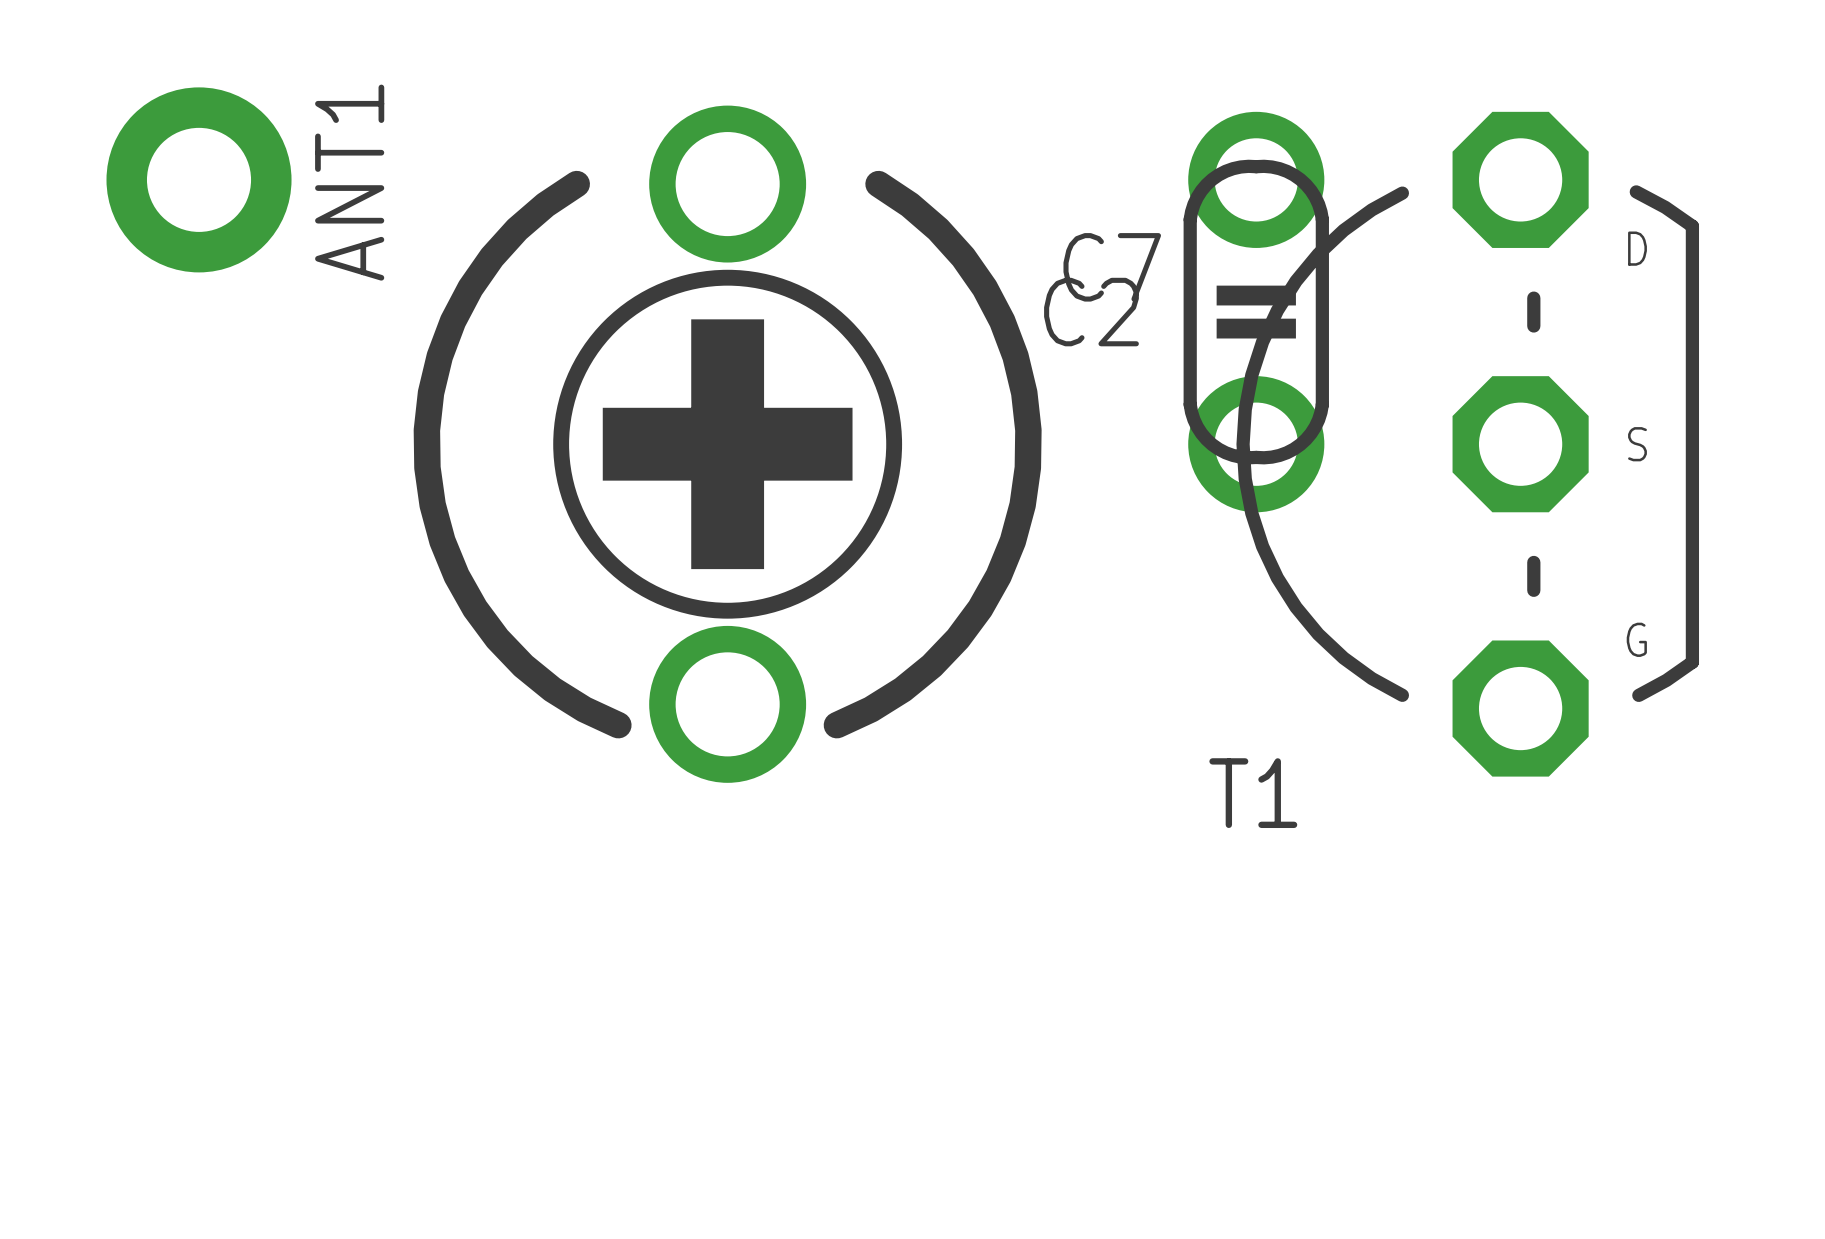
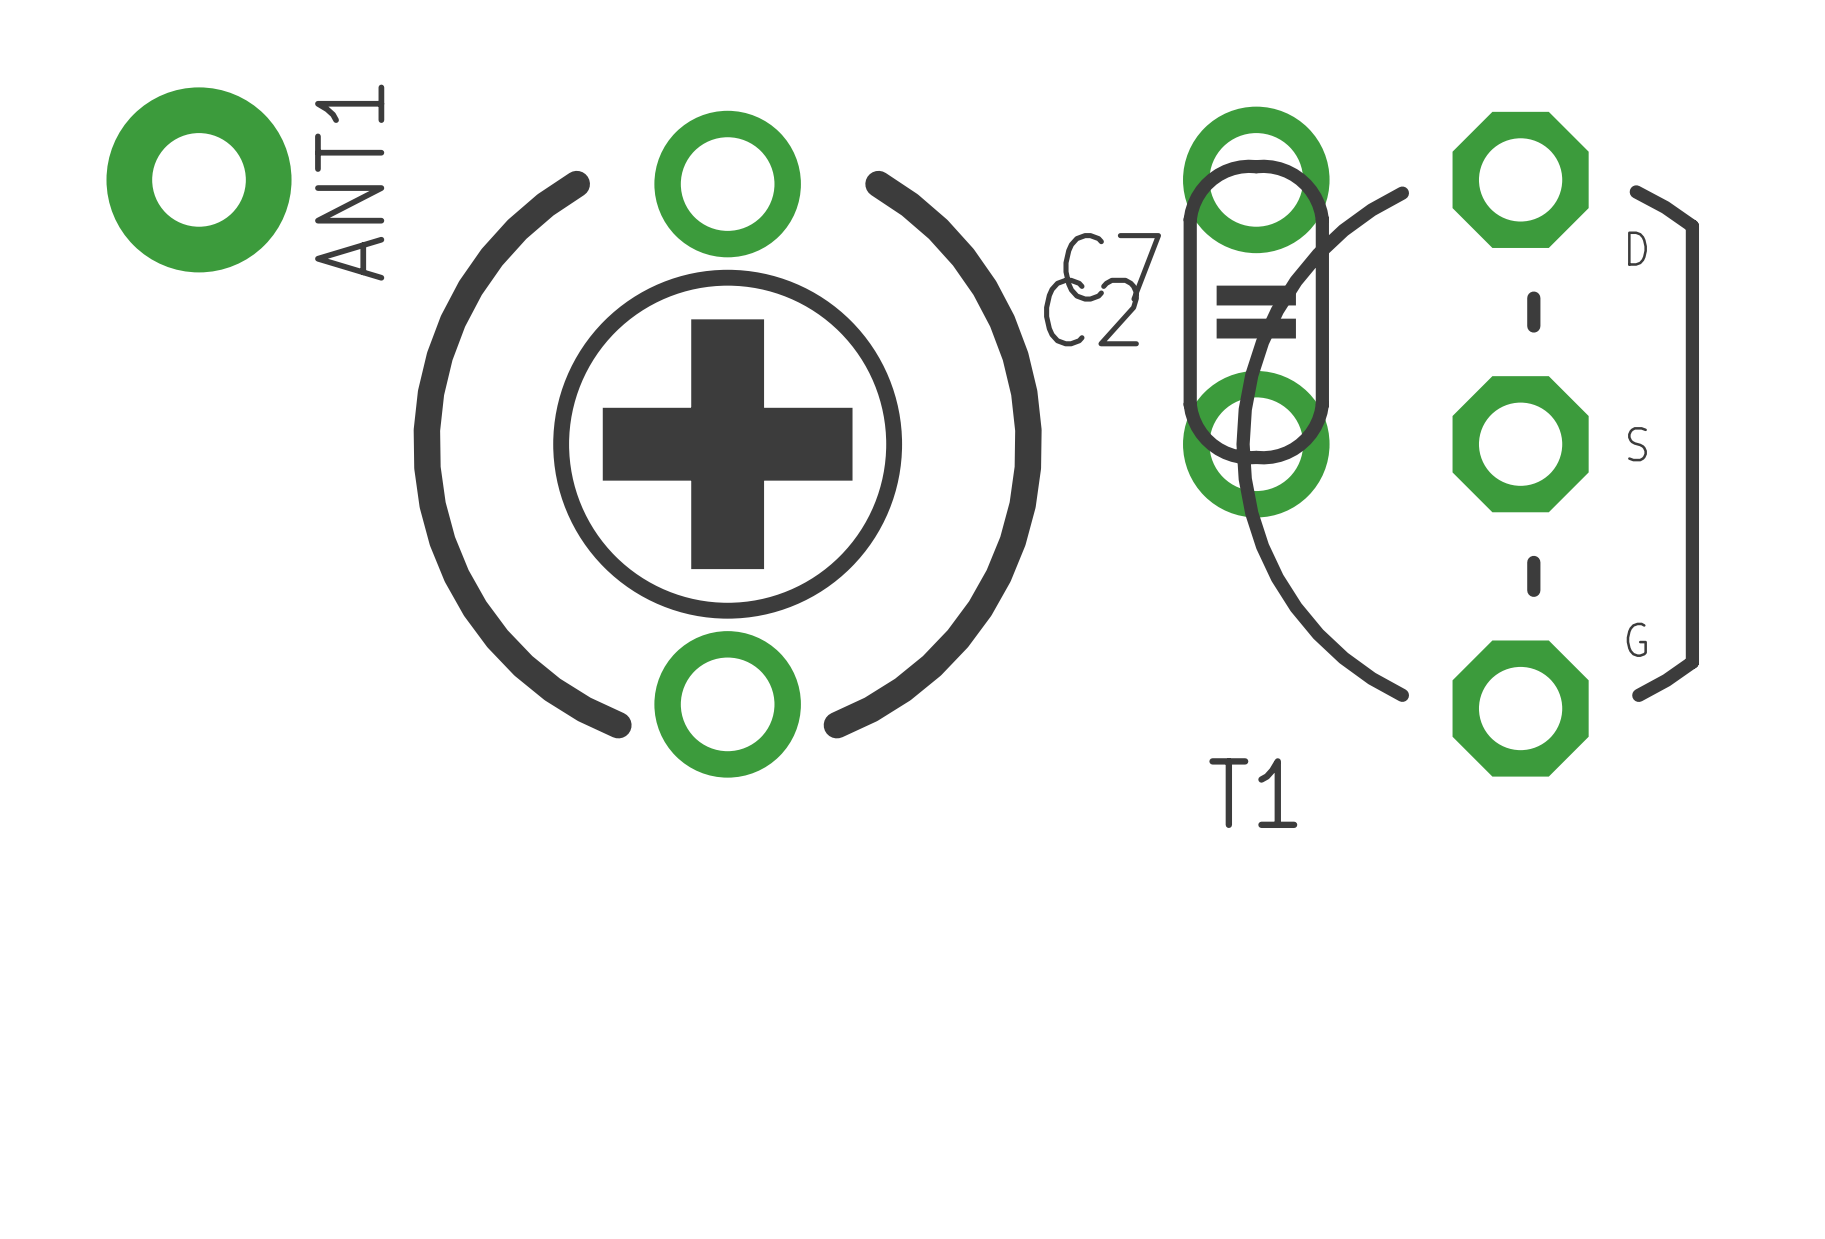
ANT1 footprint: [106, 87, 292, 273] -> [106, 87, 292, 273]
C7 footprint: [413, 105, 1042, 783] -> [413, 110, 1042, 778]
C2 footprint: [1183, 111, 1329, 513] -> [1183, 106, 1330, 518]

